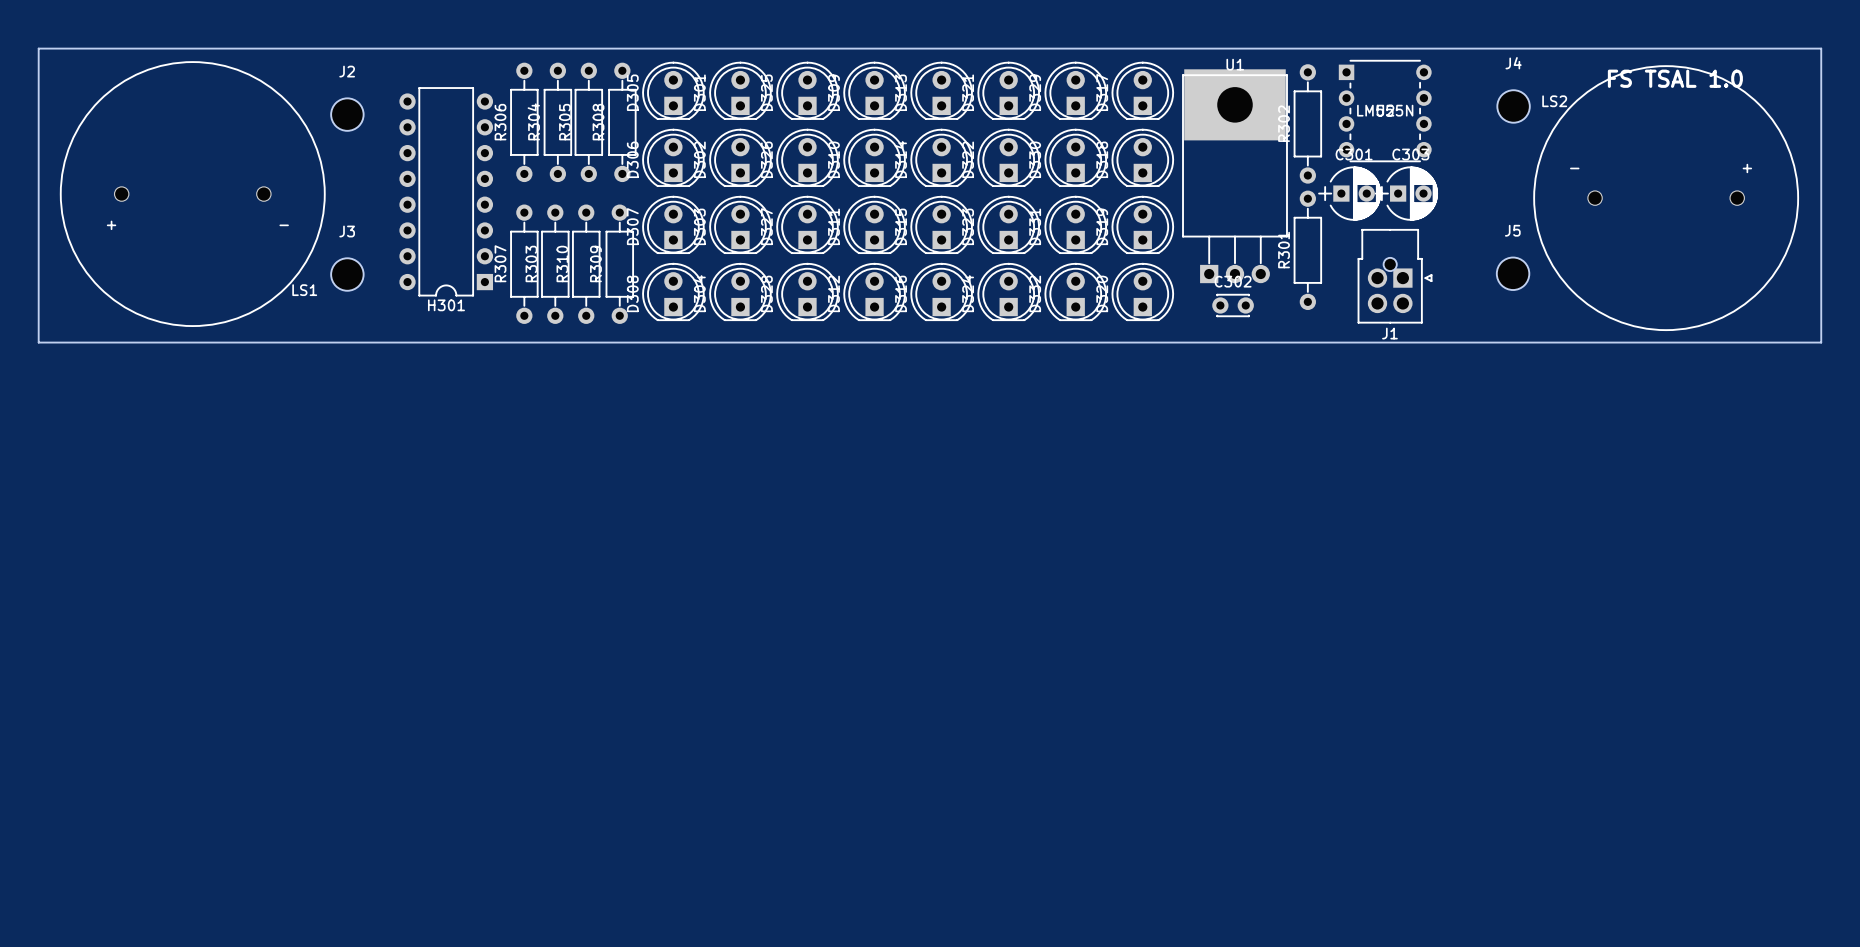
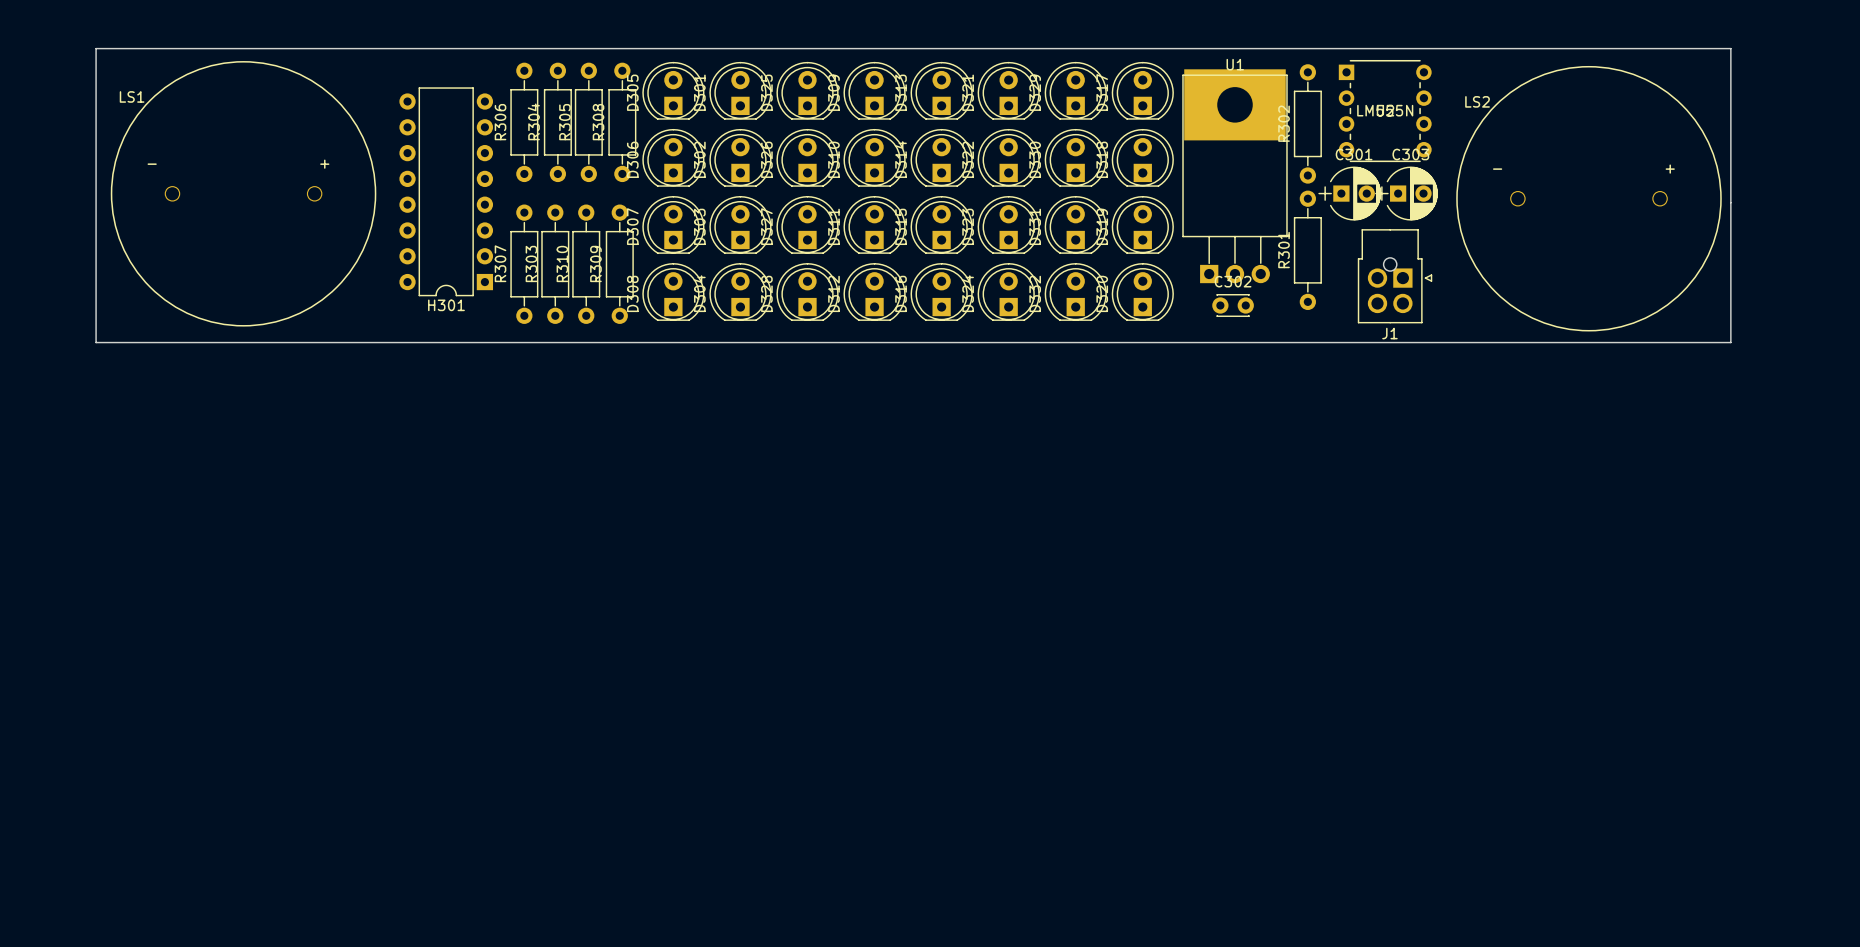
board edge: (96, 48) (38, 48) (38, 342) (96, 342) -> (96, 48) (96, 342)
board edge: (1730, 48) (1821, 48) (1821, 342) (1730, 342) -> (1730, 48) (1730, 342)
text: FS TSAL 1.0 (1675, 78) -> none
J4: (1513, 106) -> none
J2: (347, 114) -> none
LS1 rotation: 0° (192, 194) -> 180° (243, 193)
LS2 position: (1666, 198) -> (1588, 198)
J5: (1513, 273) -> none
J3: (347, 274) -> none

